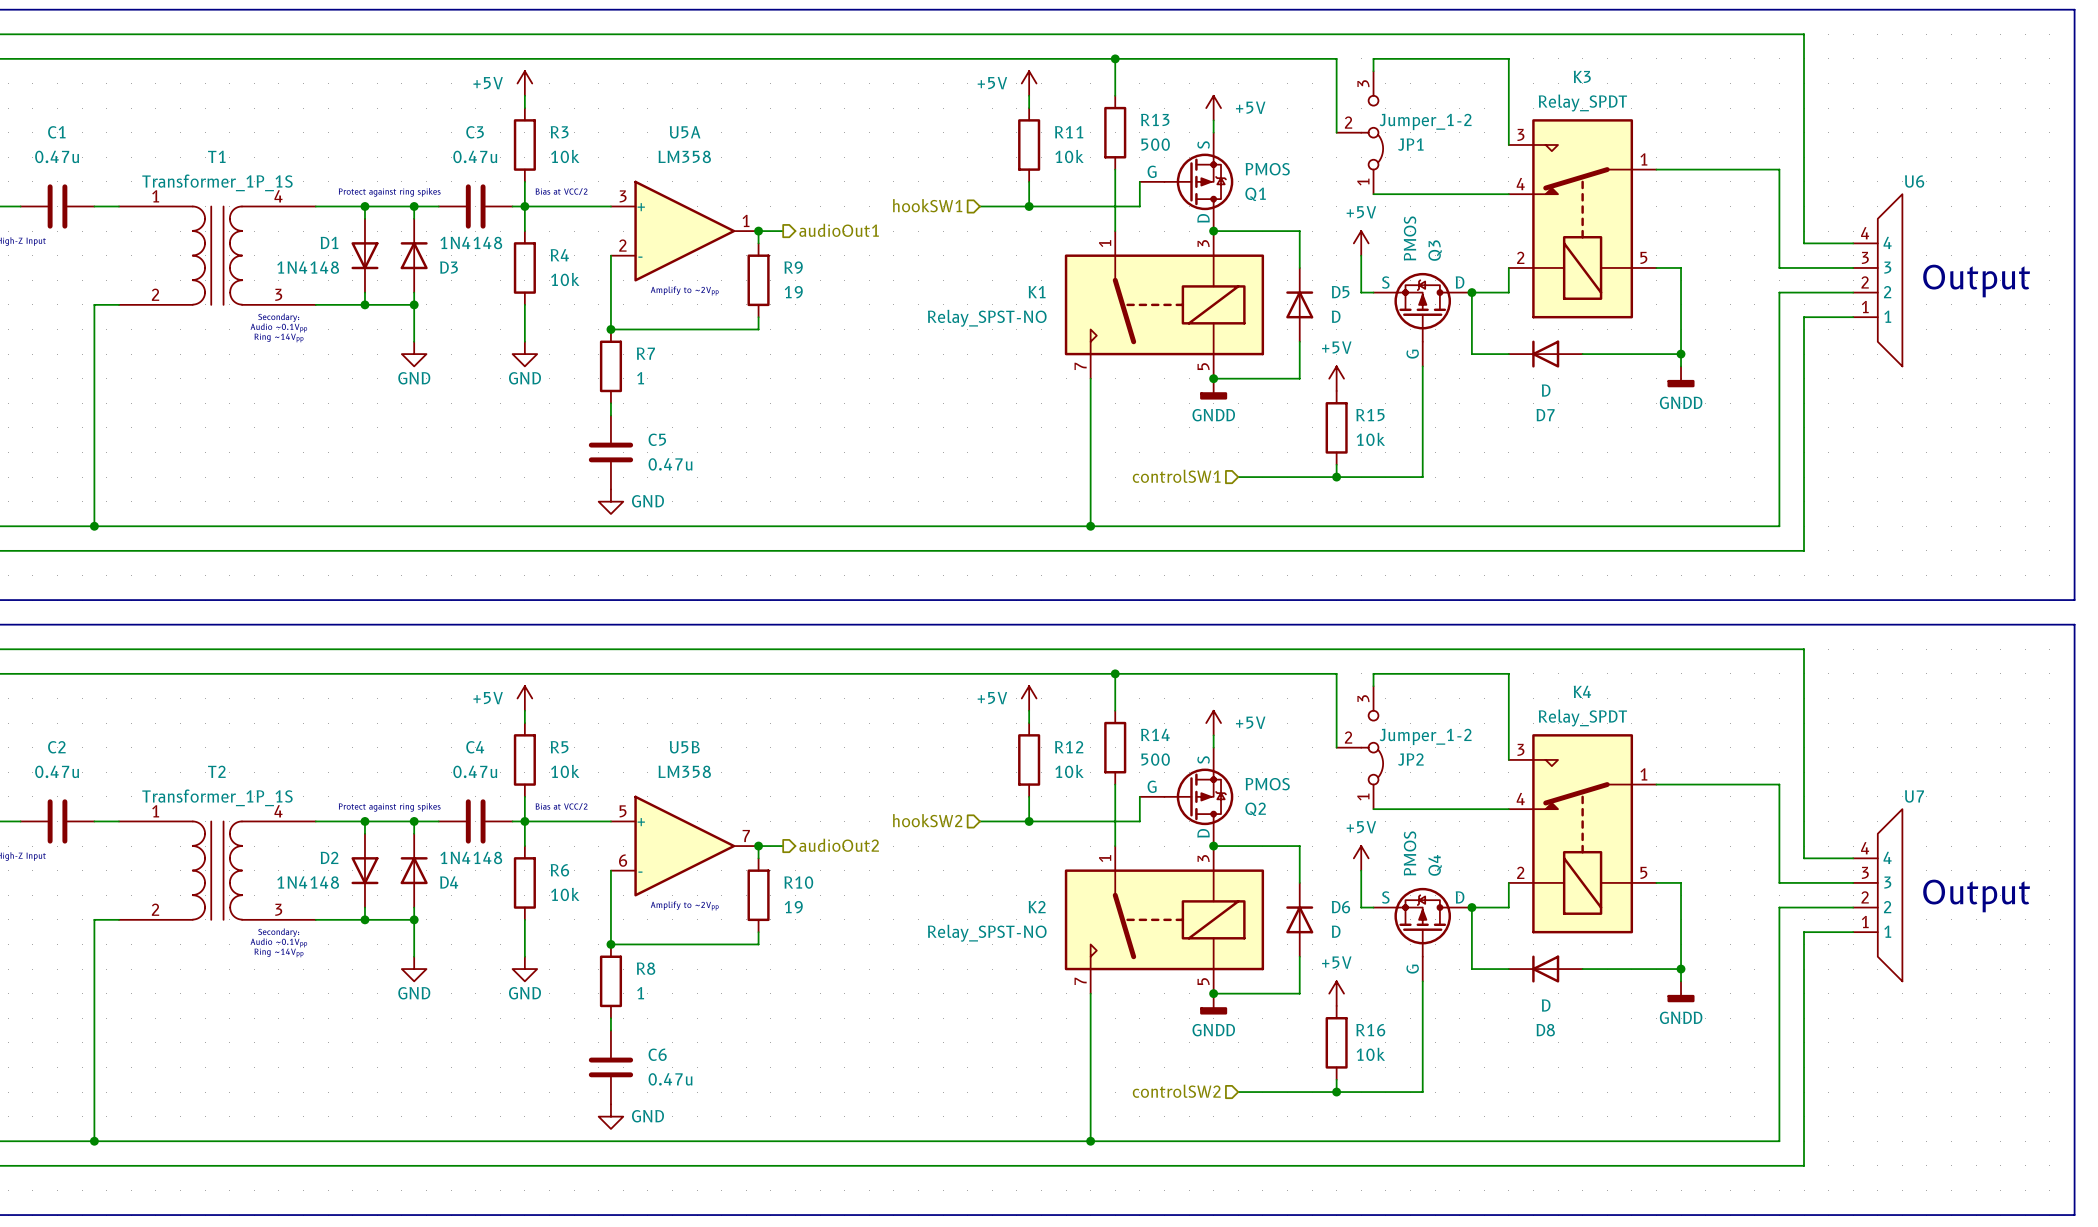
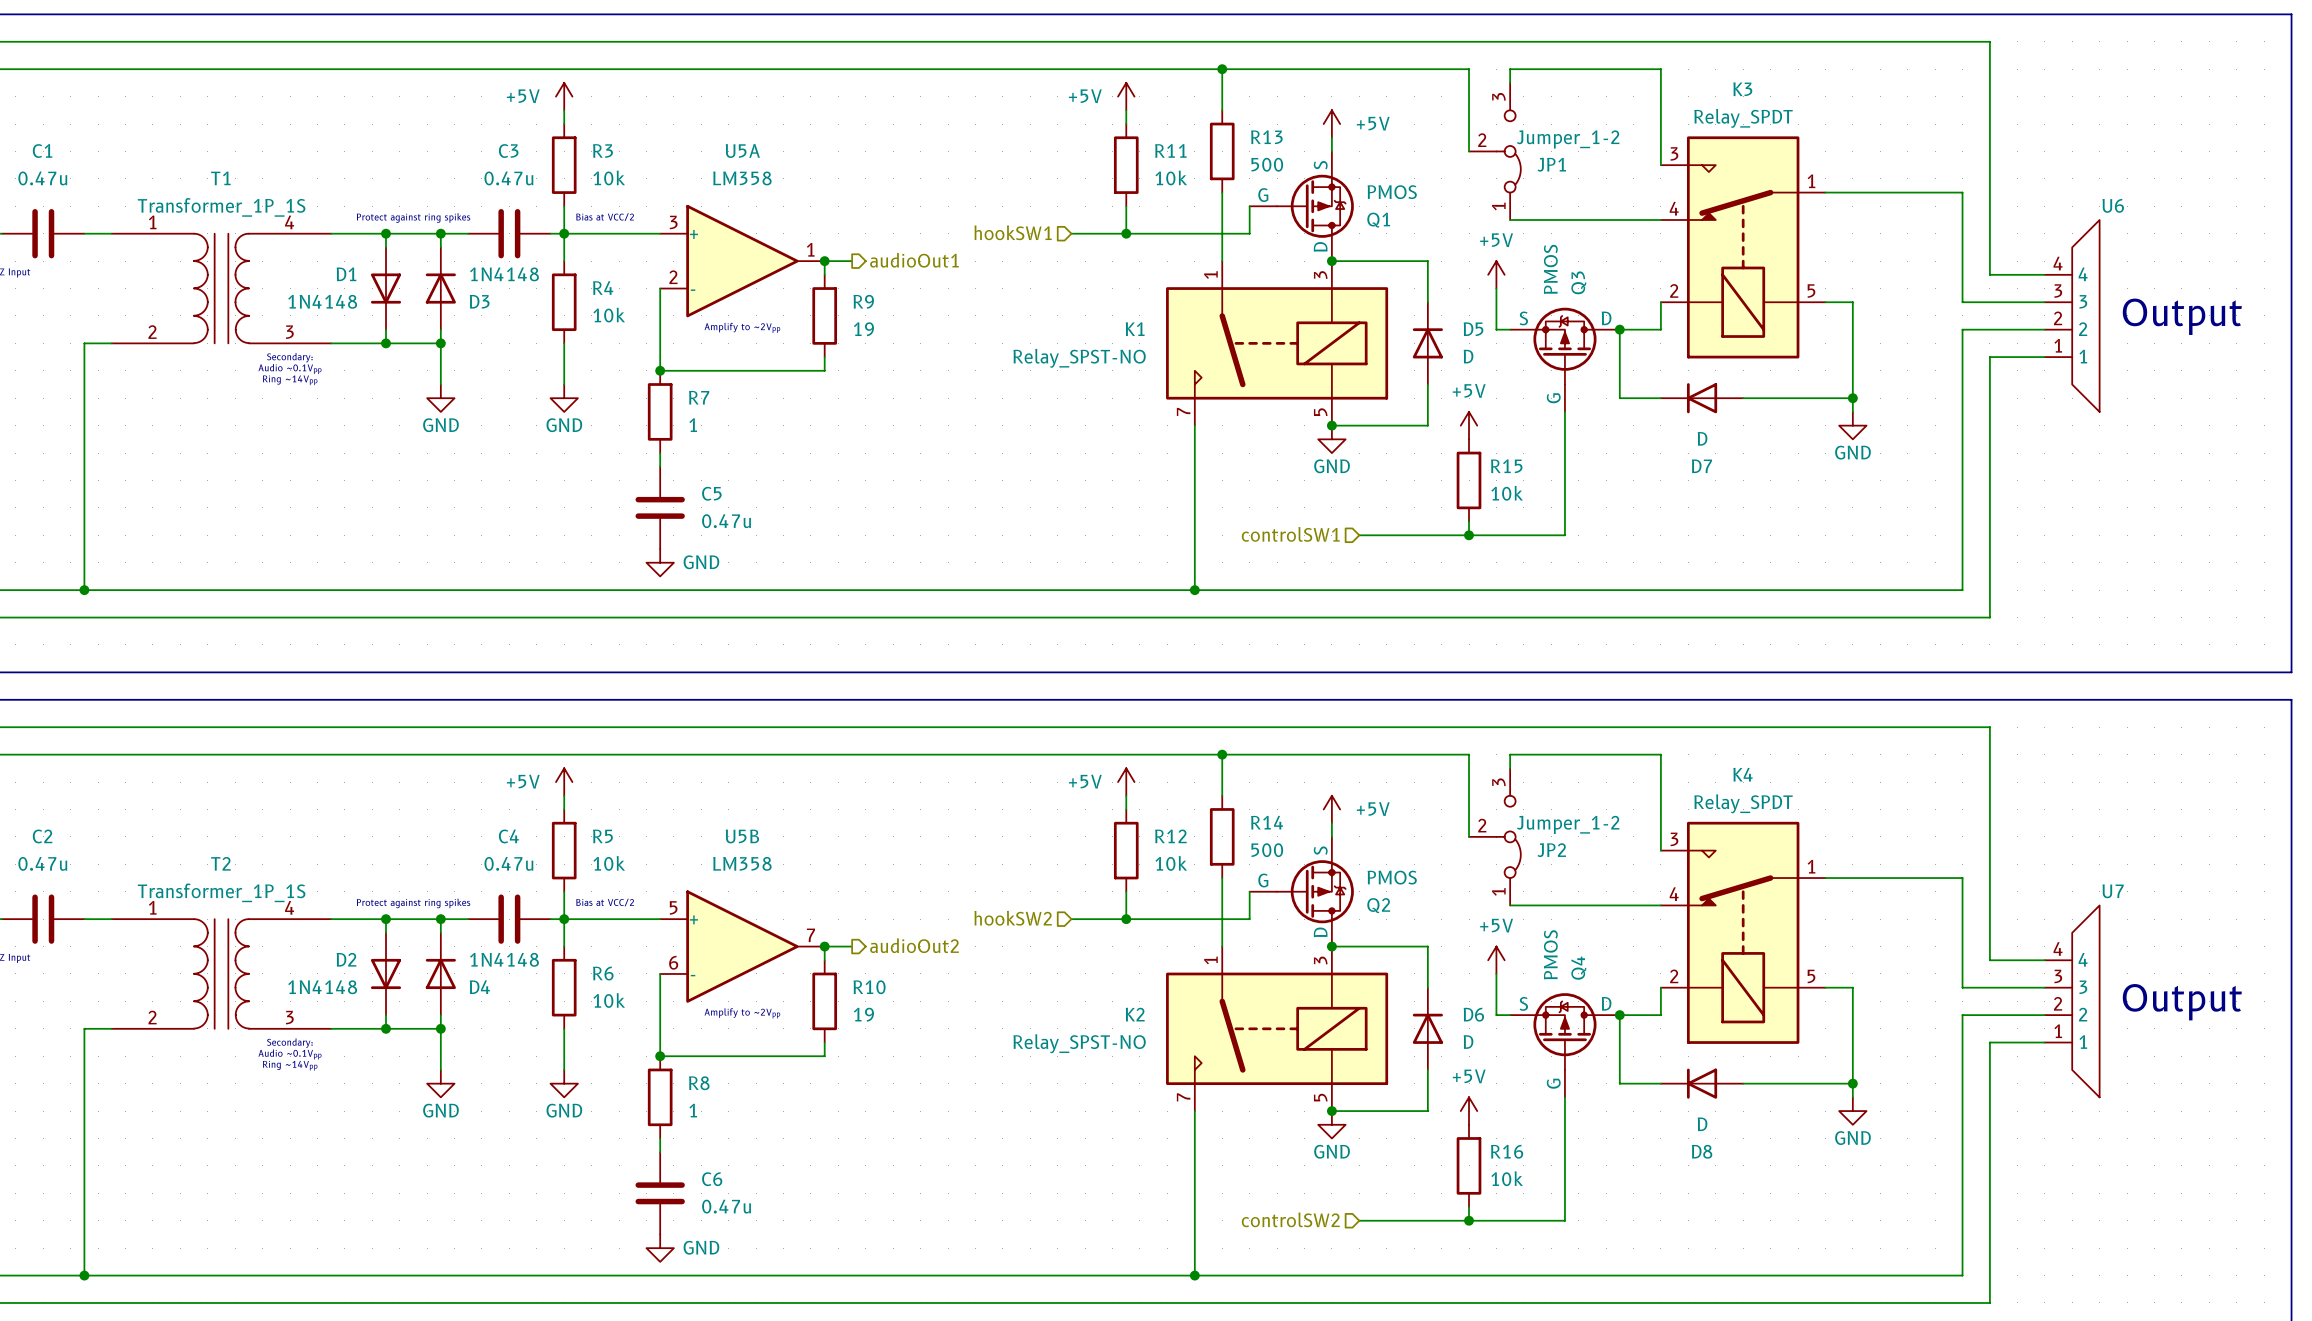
power symbol: GNDD (1681, 376) -> GND (1852, 425)
power symbol: GNDD (1213, 389) -> GND (1331, 439)
power symbol: GNDD (1681, 991) -> GND (1852, 1111)
power symbol: GNDD (1213, 1004) -> GND (1331, 1124)

